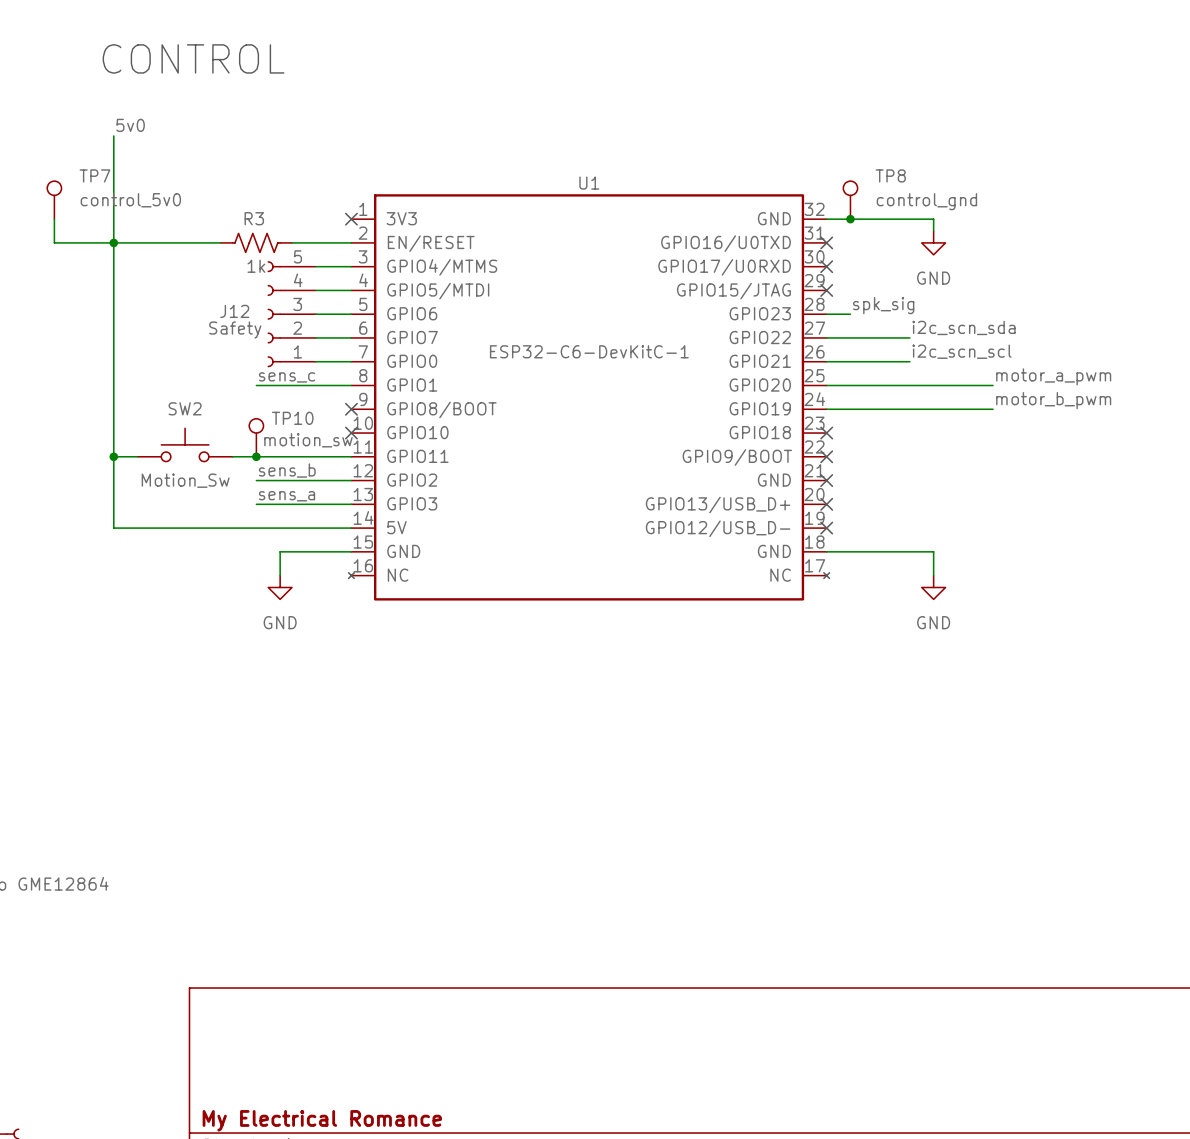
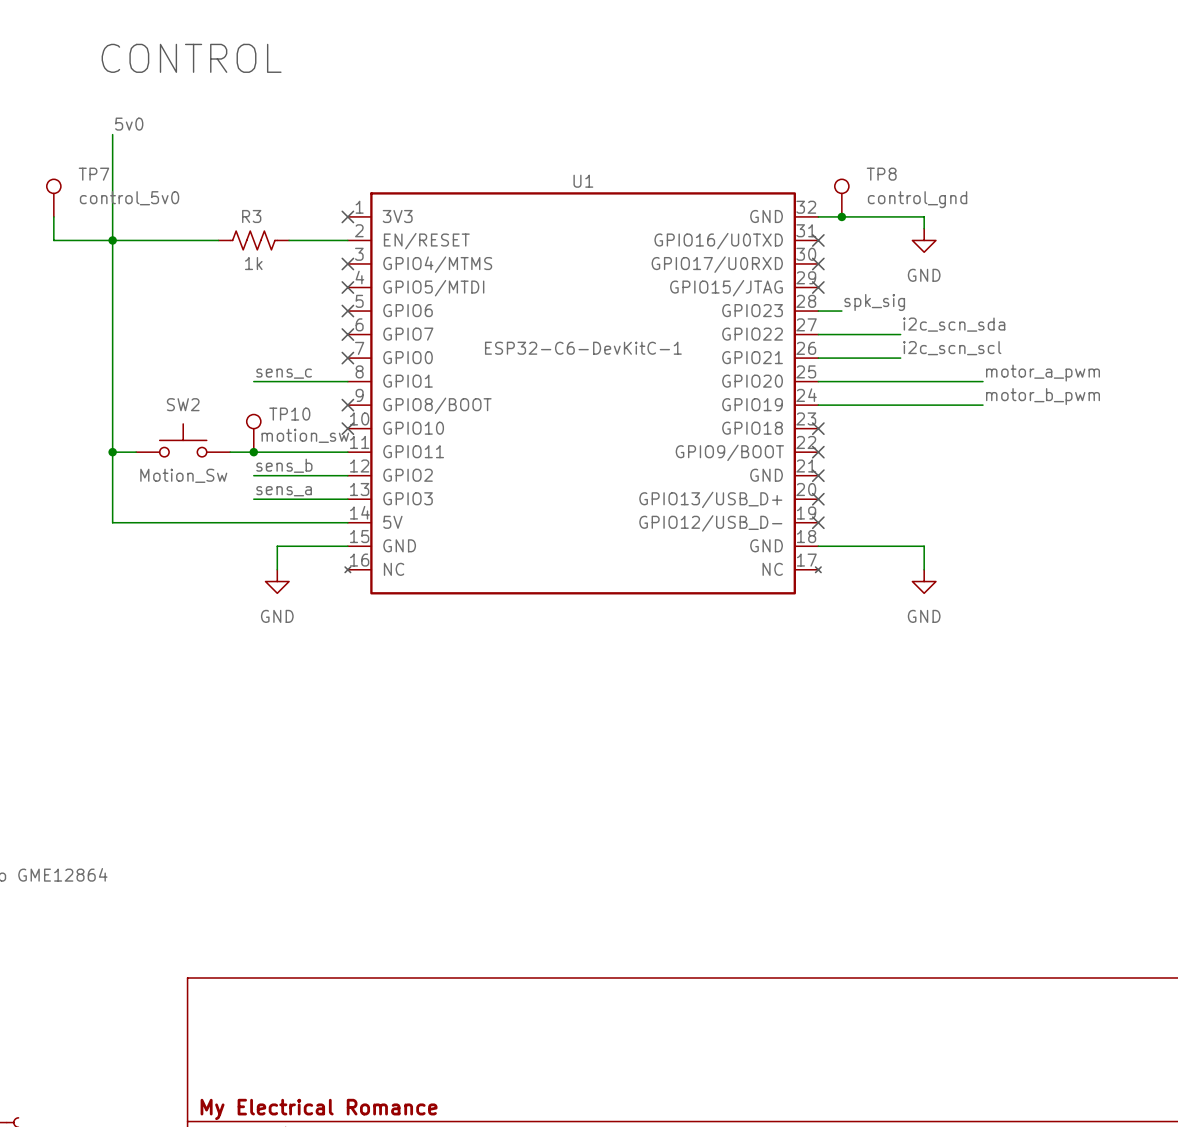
wire: (315, 266) (351, 266) -> none
no-connect mark: none -> (347, 263)
wire: (315, 290) (351, 290) -> none
no-connect mark: none -> (347, 287)
J12: Safety (291, 314) -> none
wire: (315, 314) (351, 314) -> none
no-connect mark: none -> (347, 311)
wire: (315, 337) (351, 337) -> none
no-connect mark: none -> (347, 334)
wire: (315, 361) (351, 361) -> none
no-connect mark: none -> (347, 358)

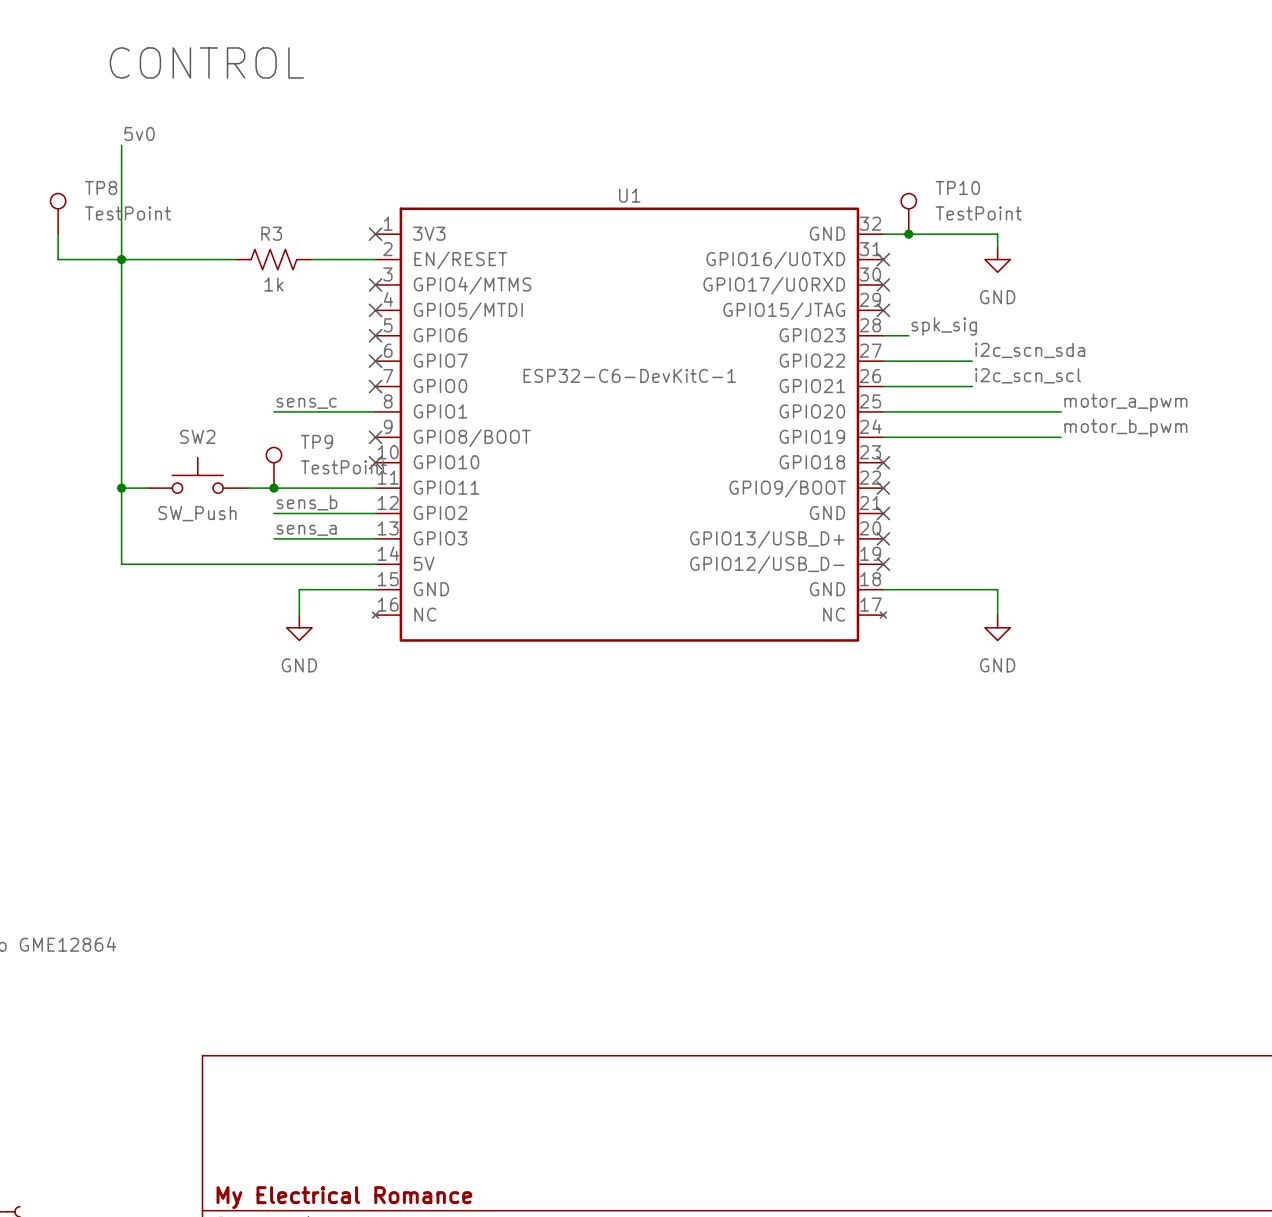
TP7 name: TP7 (93, 174) -> TP8 (101, 188)
TP8 name: TP8 (881, 174) -> TP10 (957, 188)
TP7 value: control_5v0 (129, 198) -> TestPoint (128, 213)
TP8 value: control_gnd (917, 199) -> TestPoint (978, 213)
TP10 name: TP10 (289, 414) -> TP9 (316, 441)
TP10 value: motion_sw (305, 435) -> TestPoint (343, 467)
SW2 value: Motion_Sw (183, 475) -> SW_Push (197, 513)

